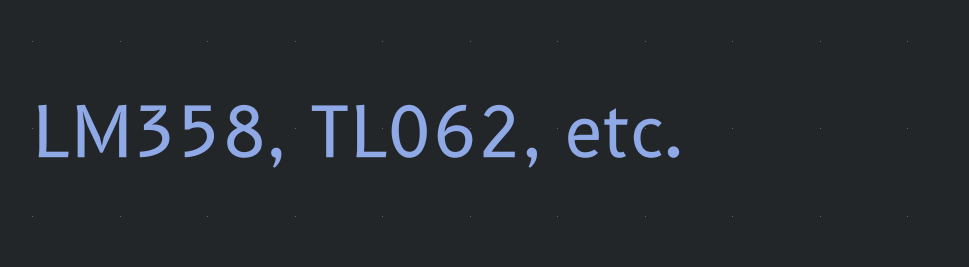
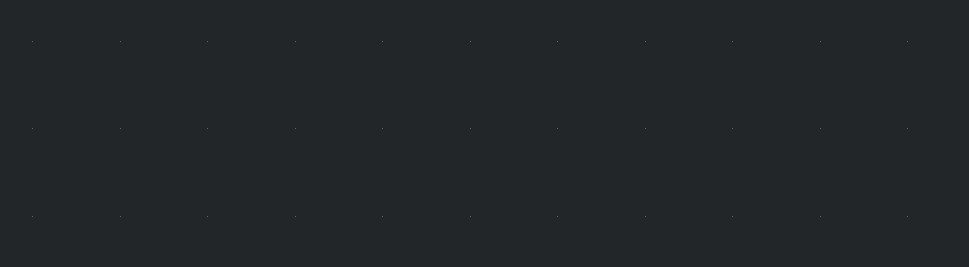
text: LM358, TL062, etc. (358, 136) -> none

